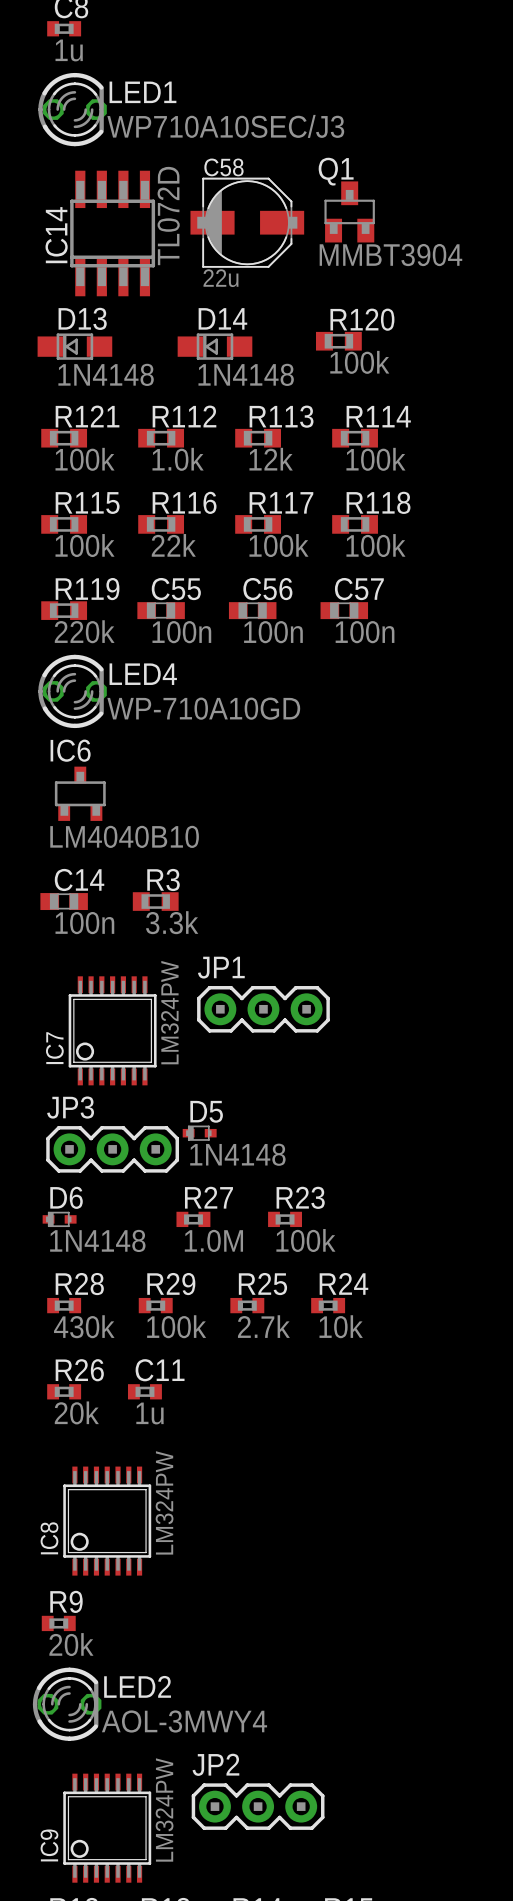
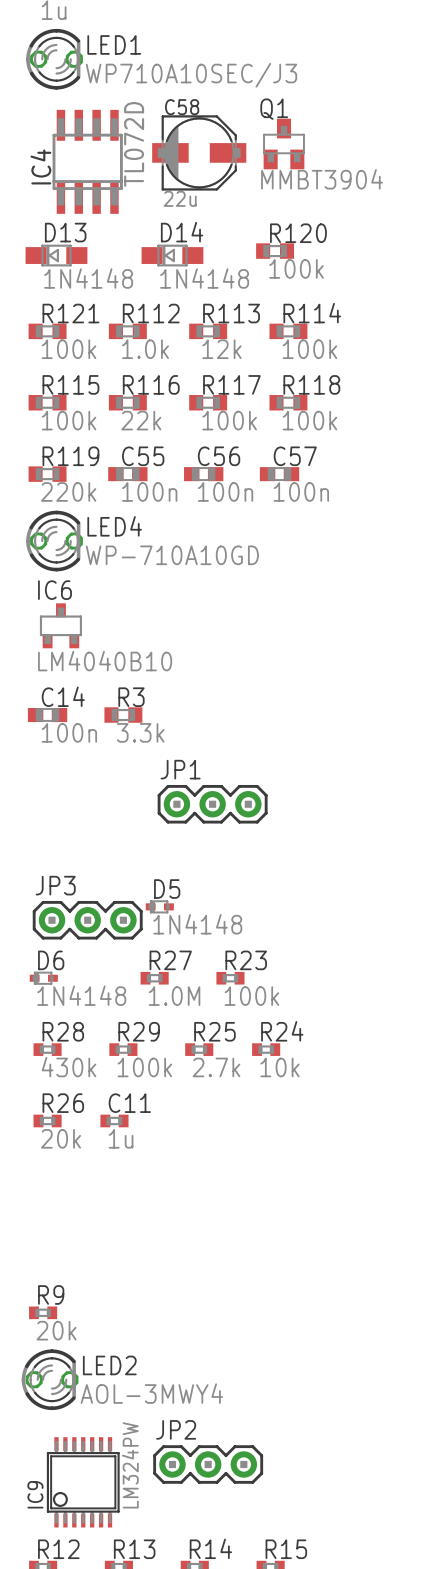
IC14 name: IC14 (56, 235) -> IC4 (40, 166)
IC7: LM324PW (112, 1030) -> none
IC8: LM324PW (107, 1521) -> none

